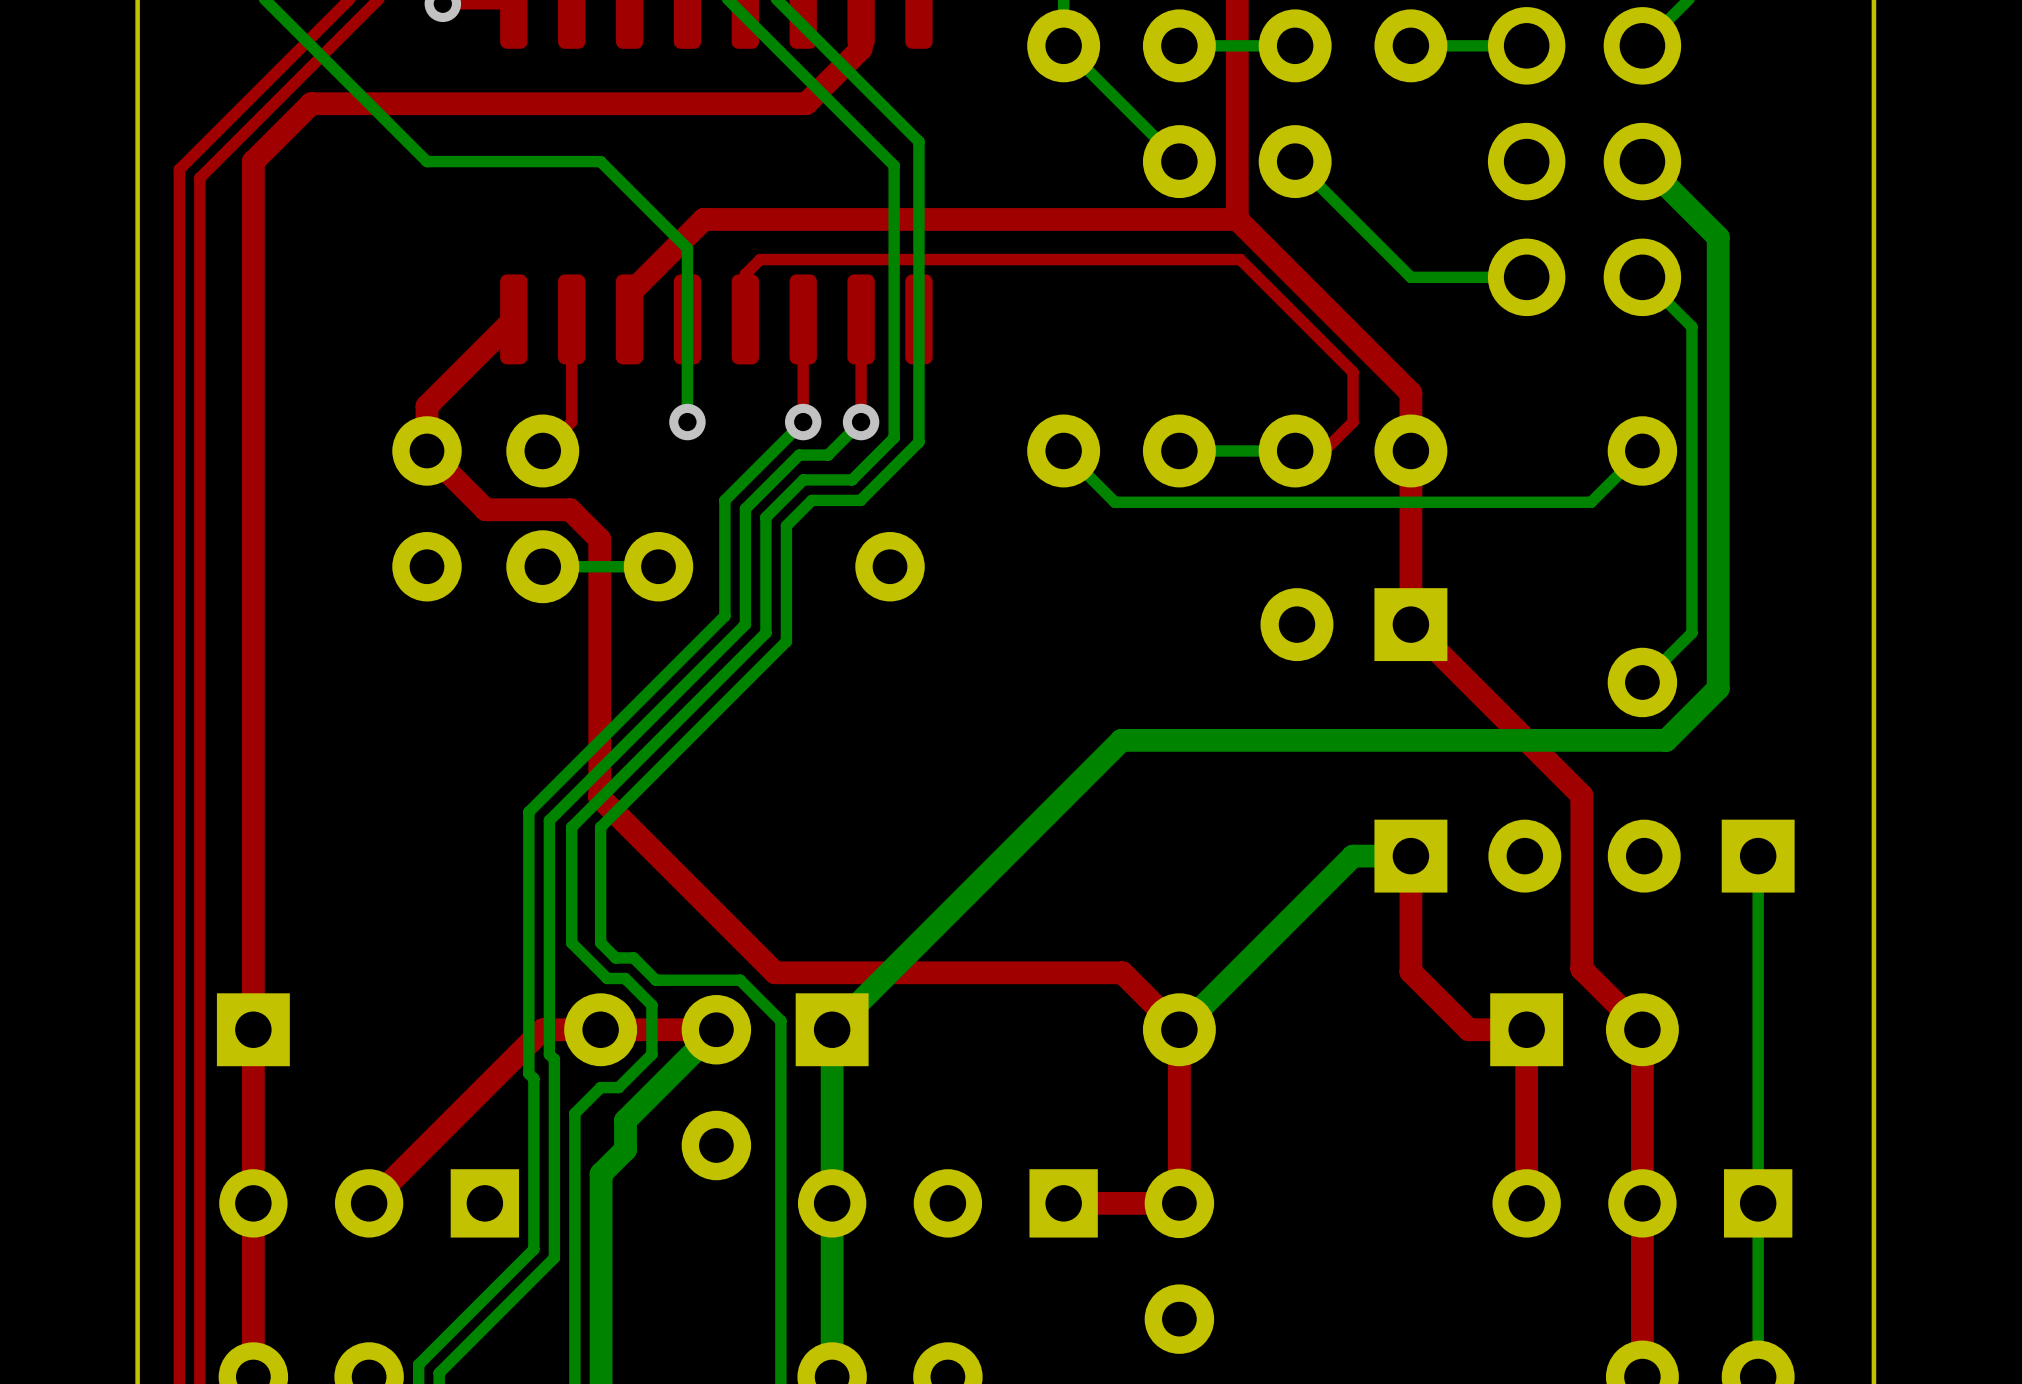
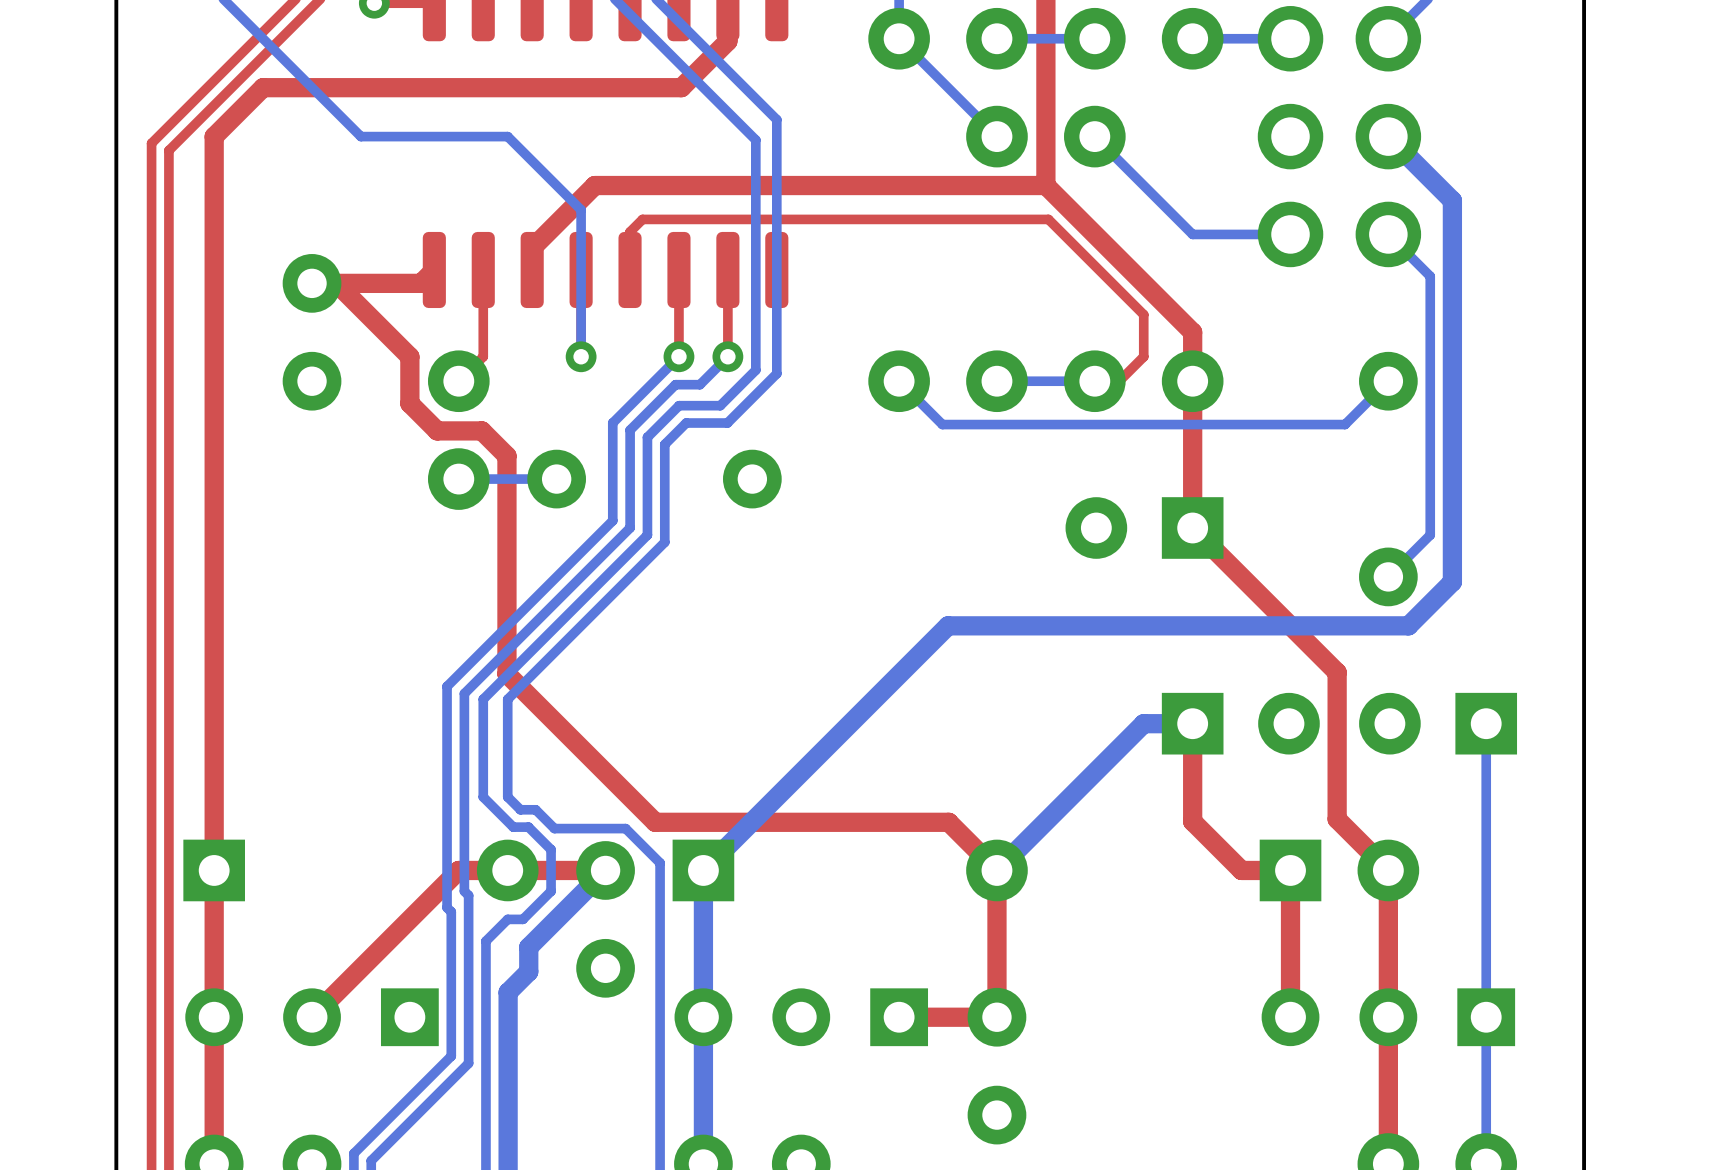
top track: (497, 335) (427, 406) (427, 450) (485, 509) (517, 509) -> (336, 283) (409, 356) (409, 403) (437, 430)
top track: none -> (420, 283) (312, 283)
part position: (427, 508) -> (312, 332)

